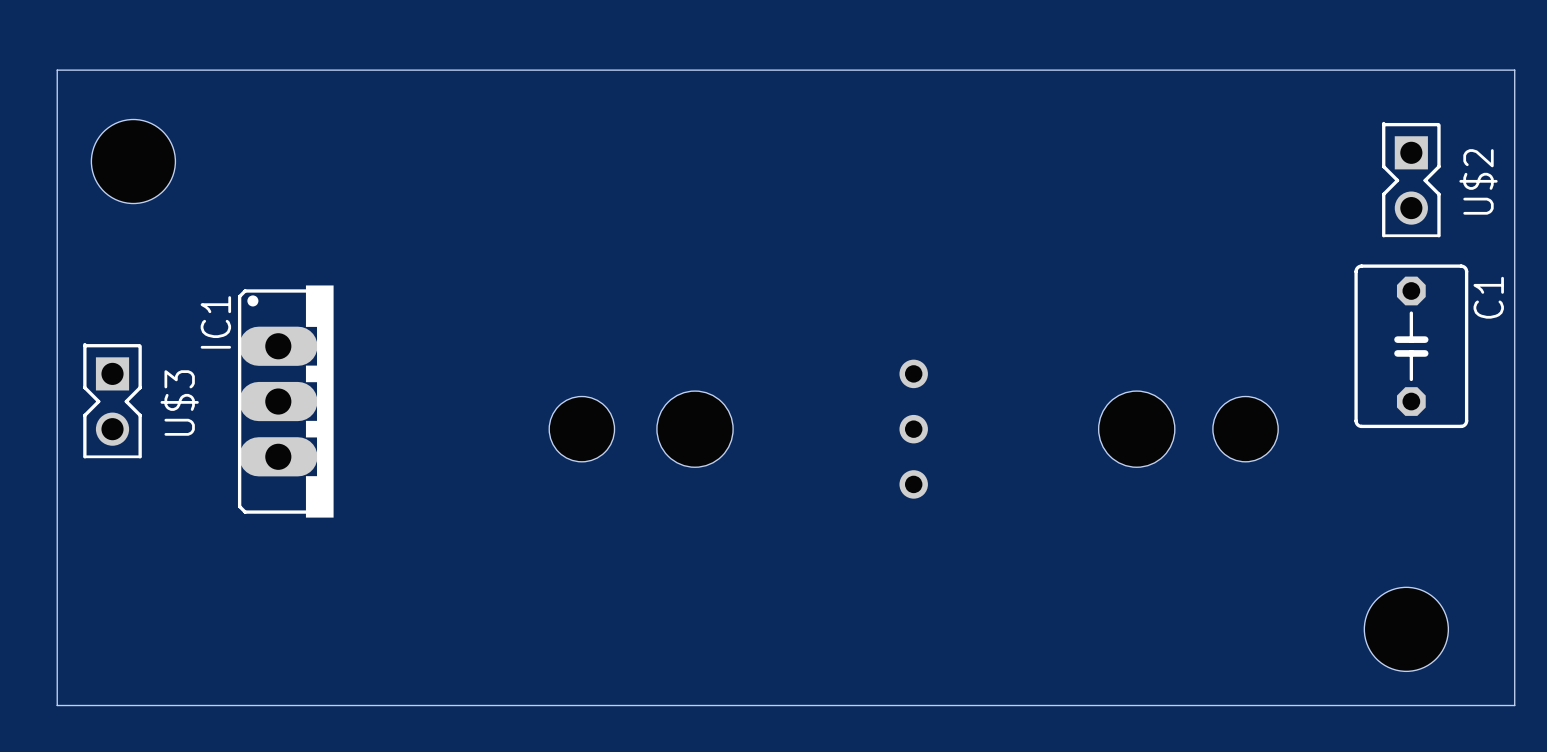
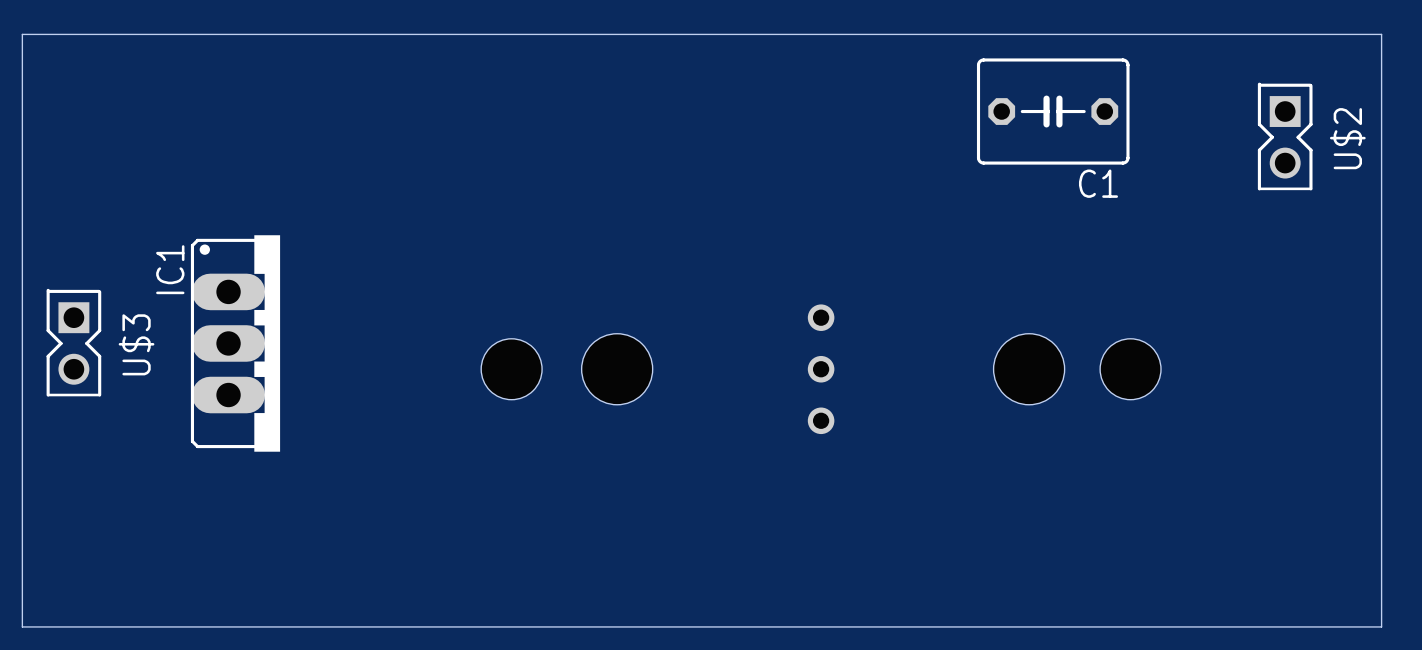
hole: (133, 161) -> none
C1 rotation: 0° (1411, 346) -> 90° clockwise (1053, 111)
C1 position: (1411, 346) -> (1053, 111)
hole: (1406, 629) -> none

